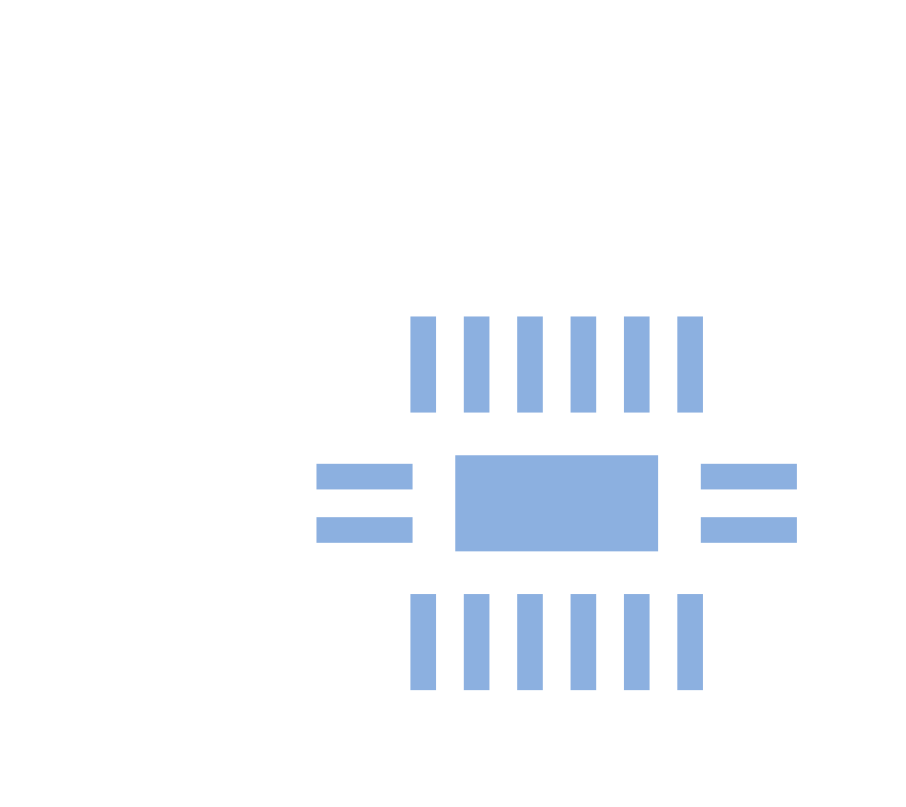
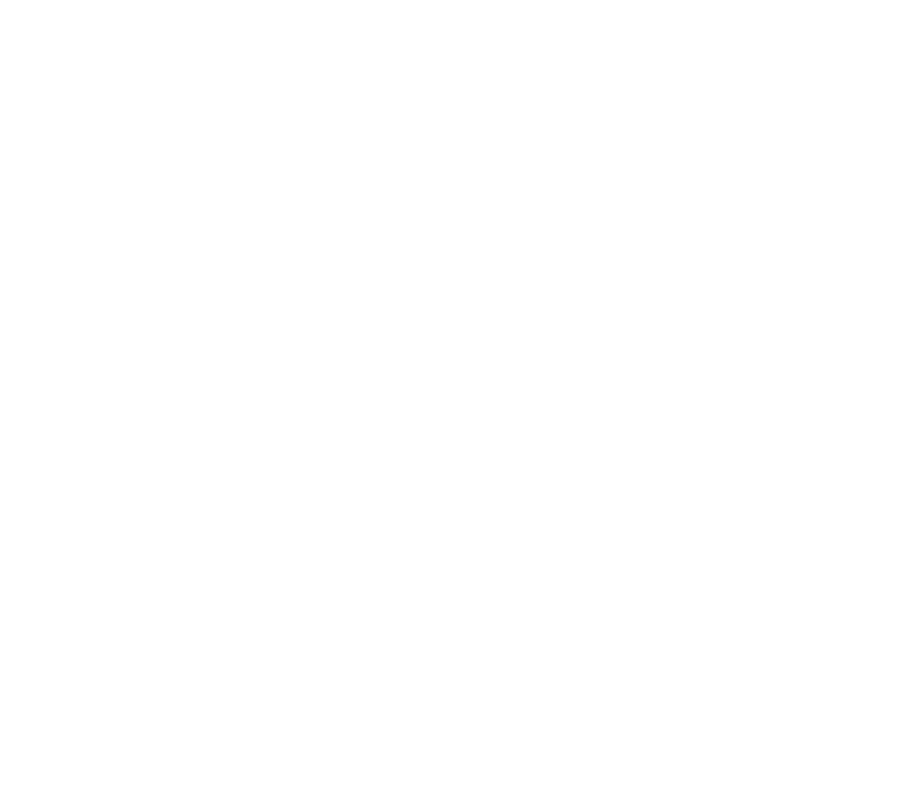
part: (556, 503) -> none

